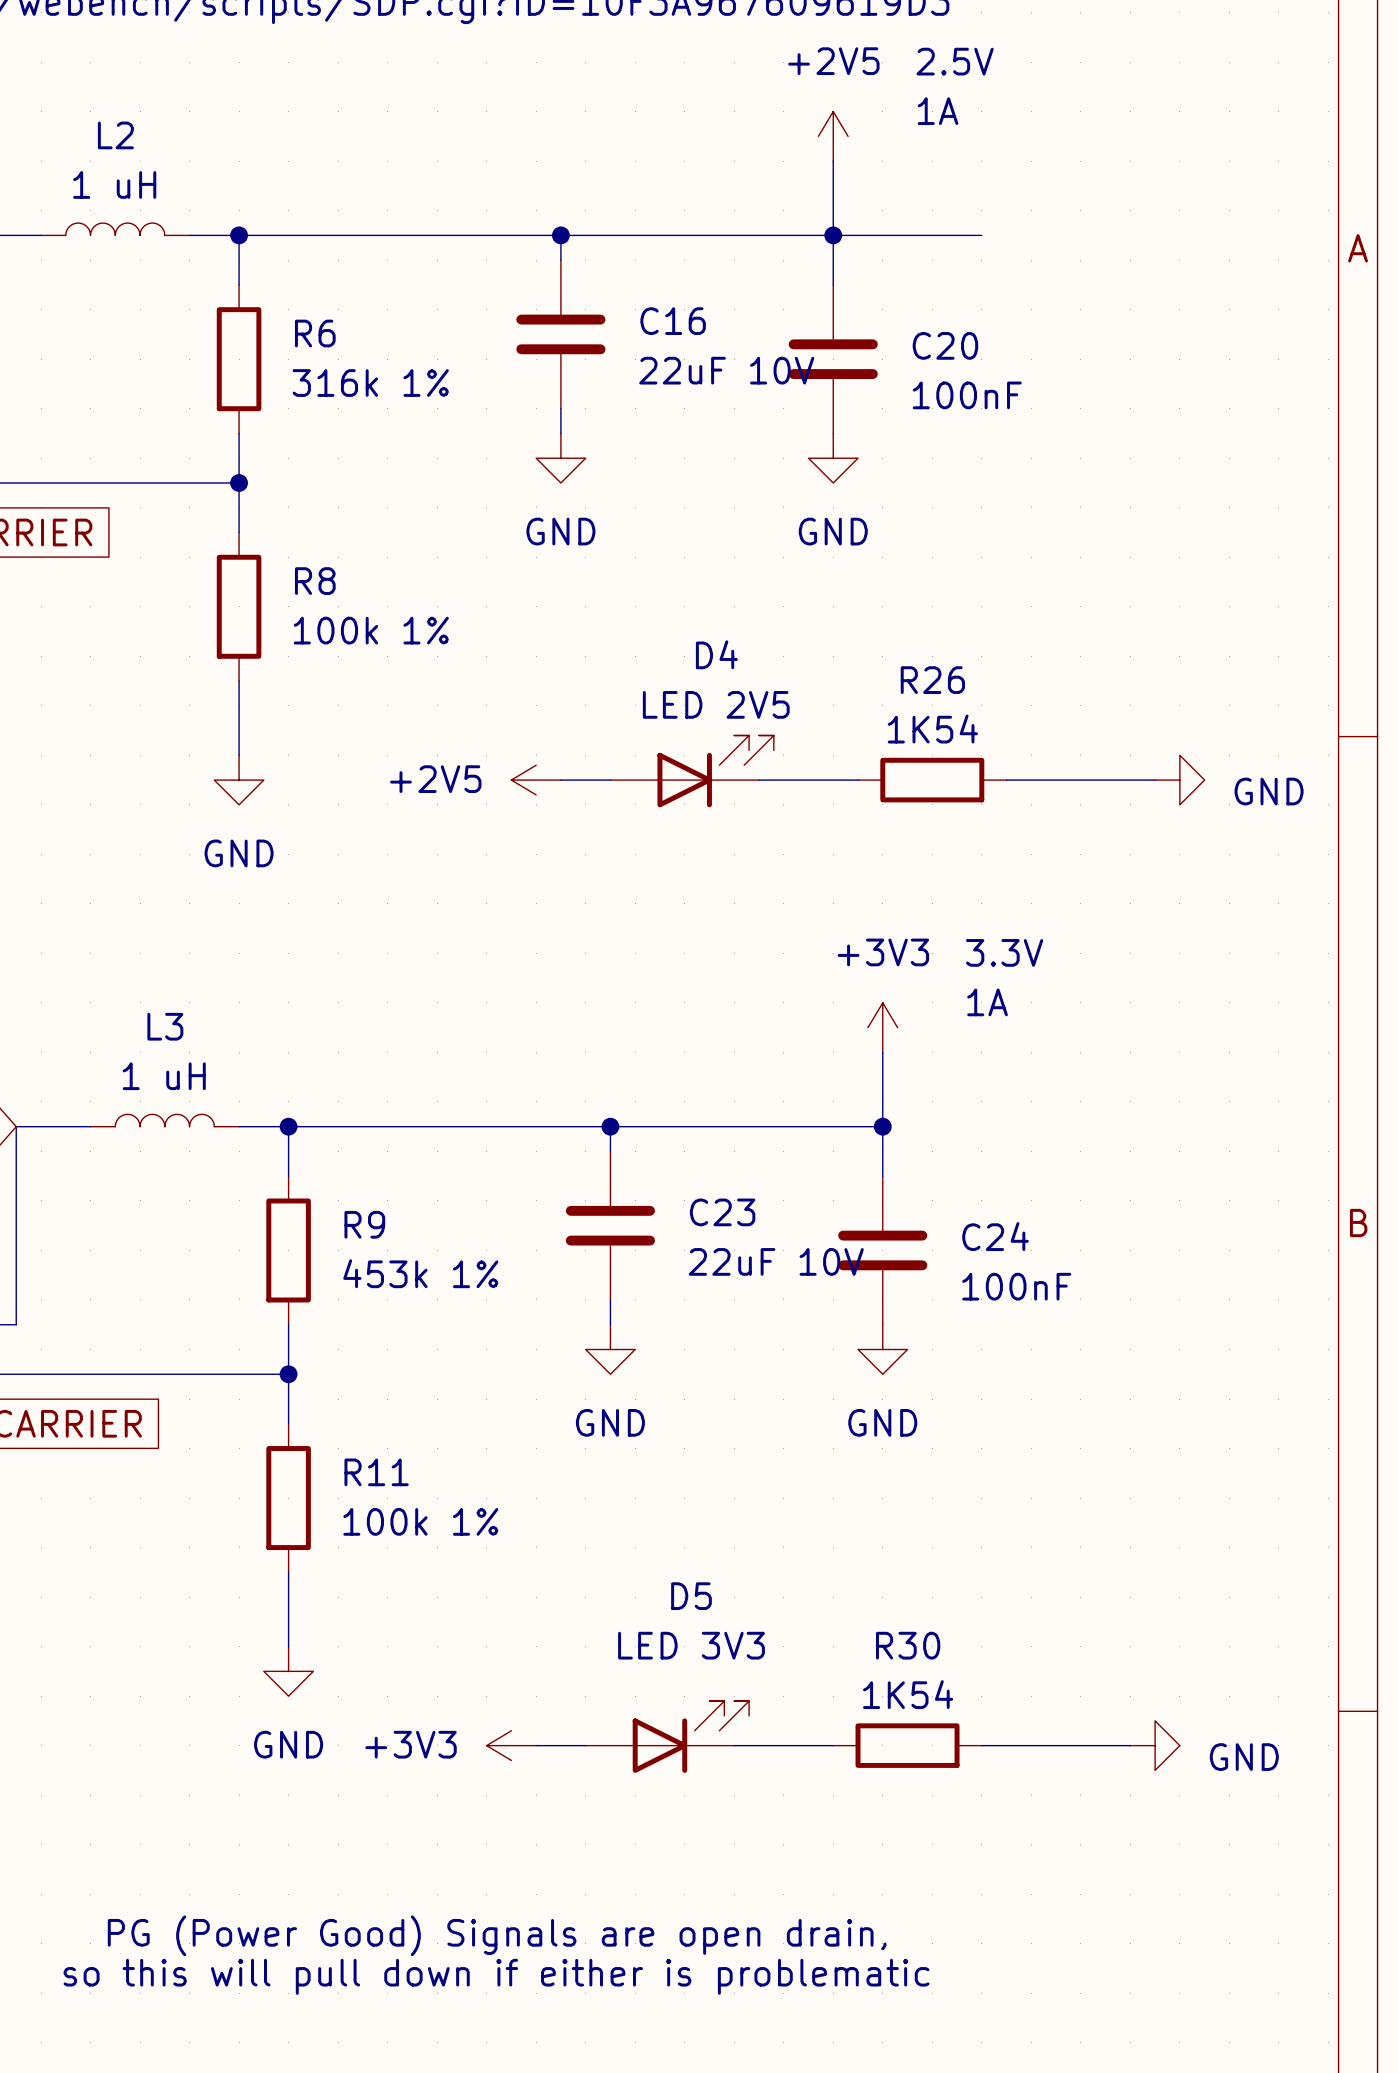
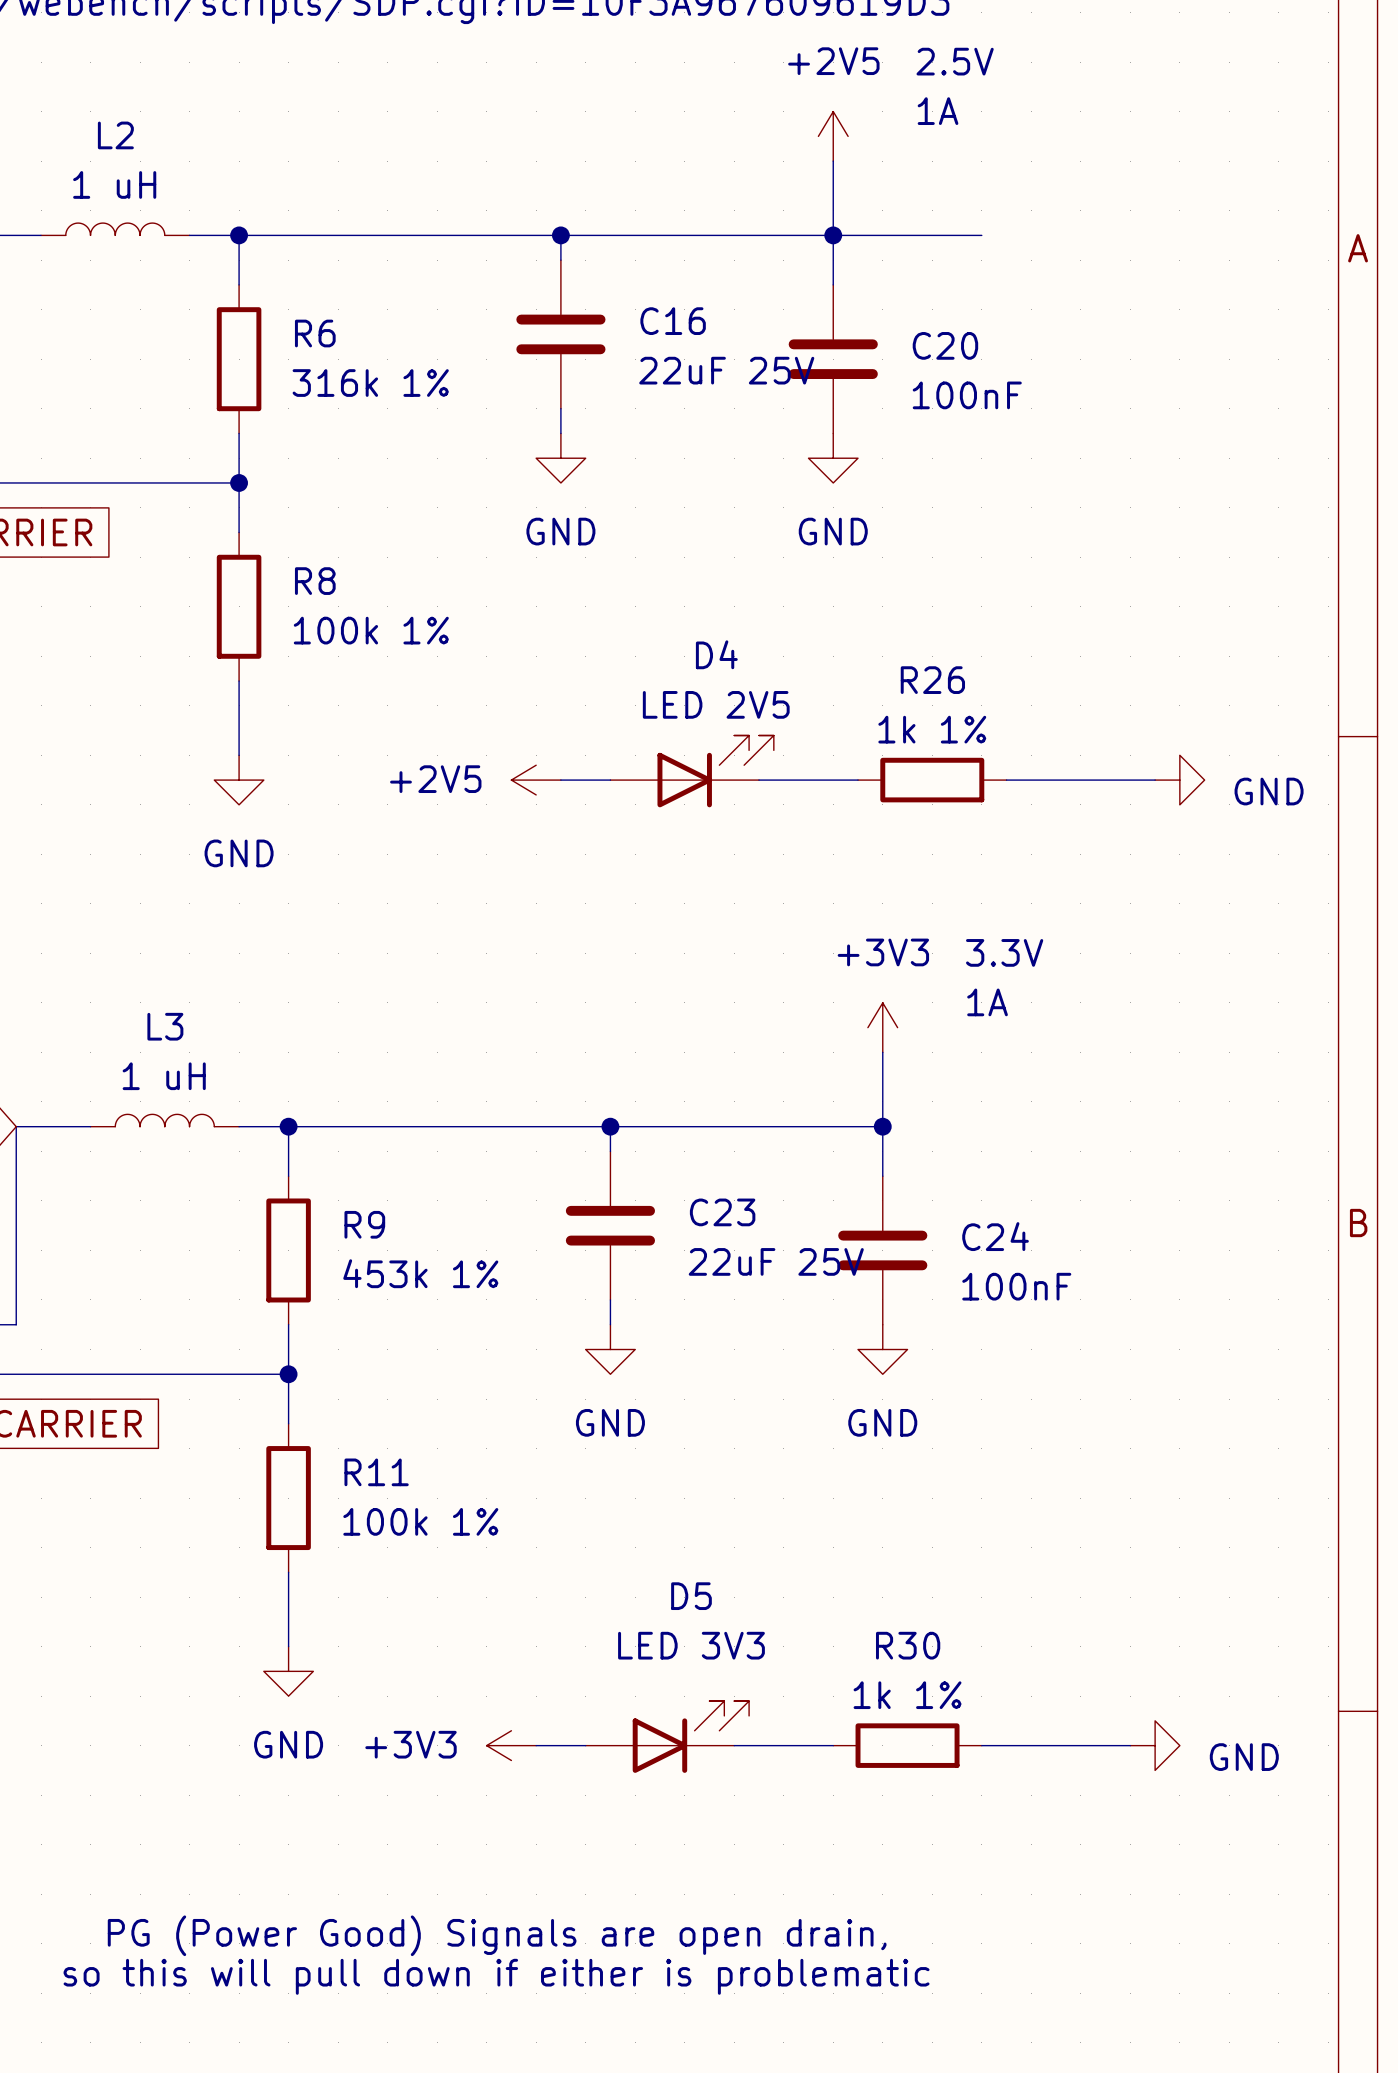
C16 value: 22uF 10V (726, 370) -> 22uF 25V (726, 370)
R26 value: 1K54 (932, 729) -> 1k 1% (932, 729)
C23 value: 22uF 10V (776, 1261) -> 22uF 25V (776, 1261)
R30 value: 1K54 (908, 1694) -> 1k 1% (907, 1695)

